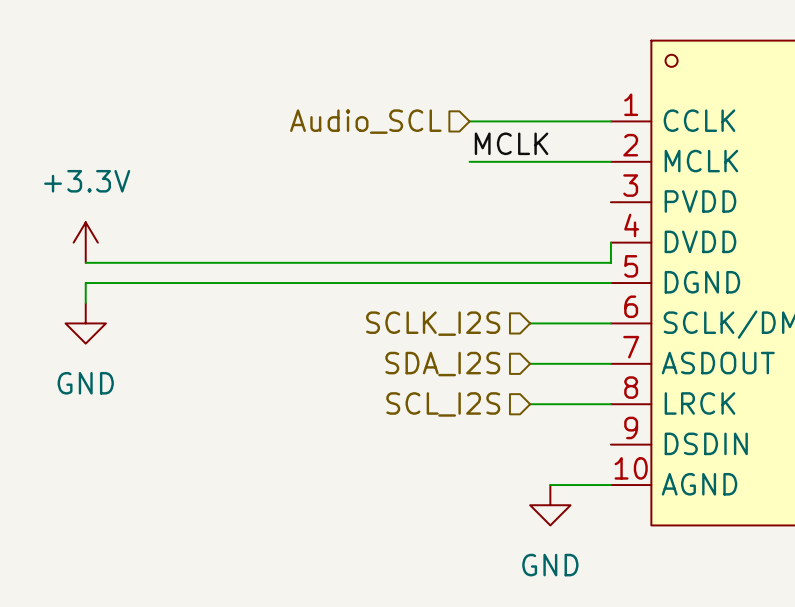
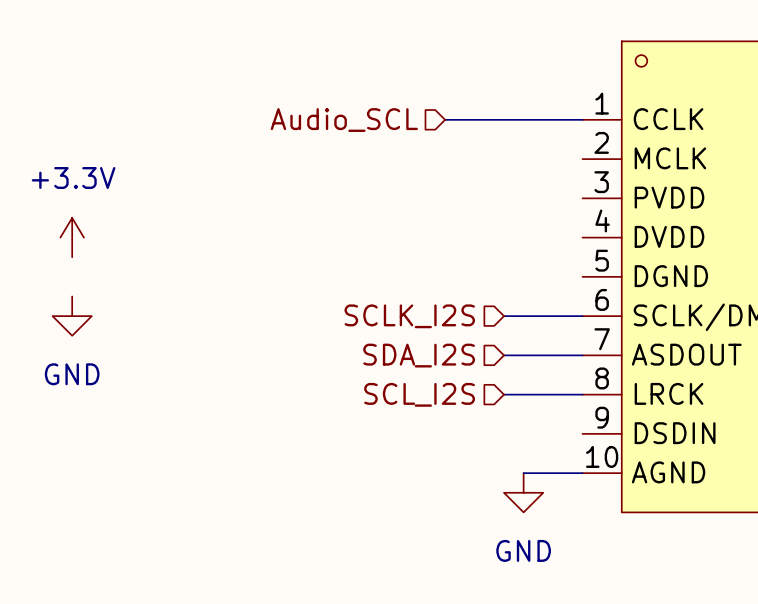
label: MCLK (511, 143) -> none
wire: (469, 161) (610, 161) -> none
wire: (610, 242) (610, 262) (85, 262) -> none
wire: (610, 283) (85, 283) (85, 303) -> none

